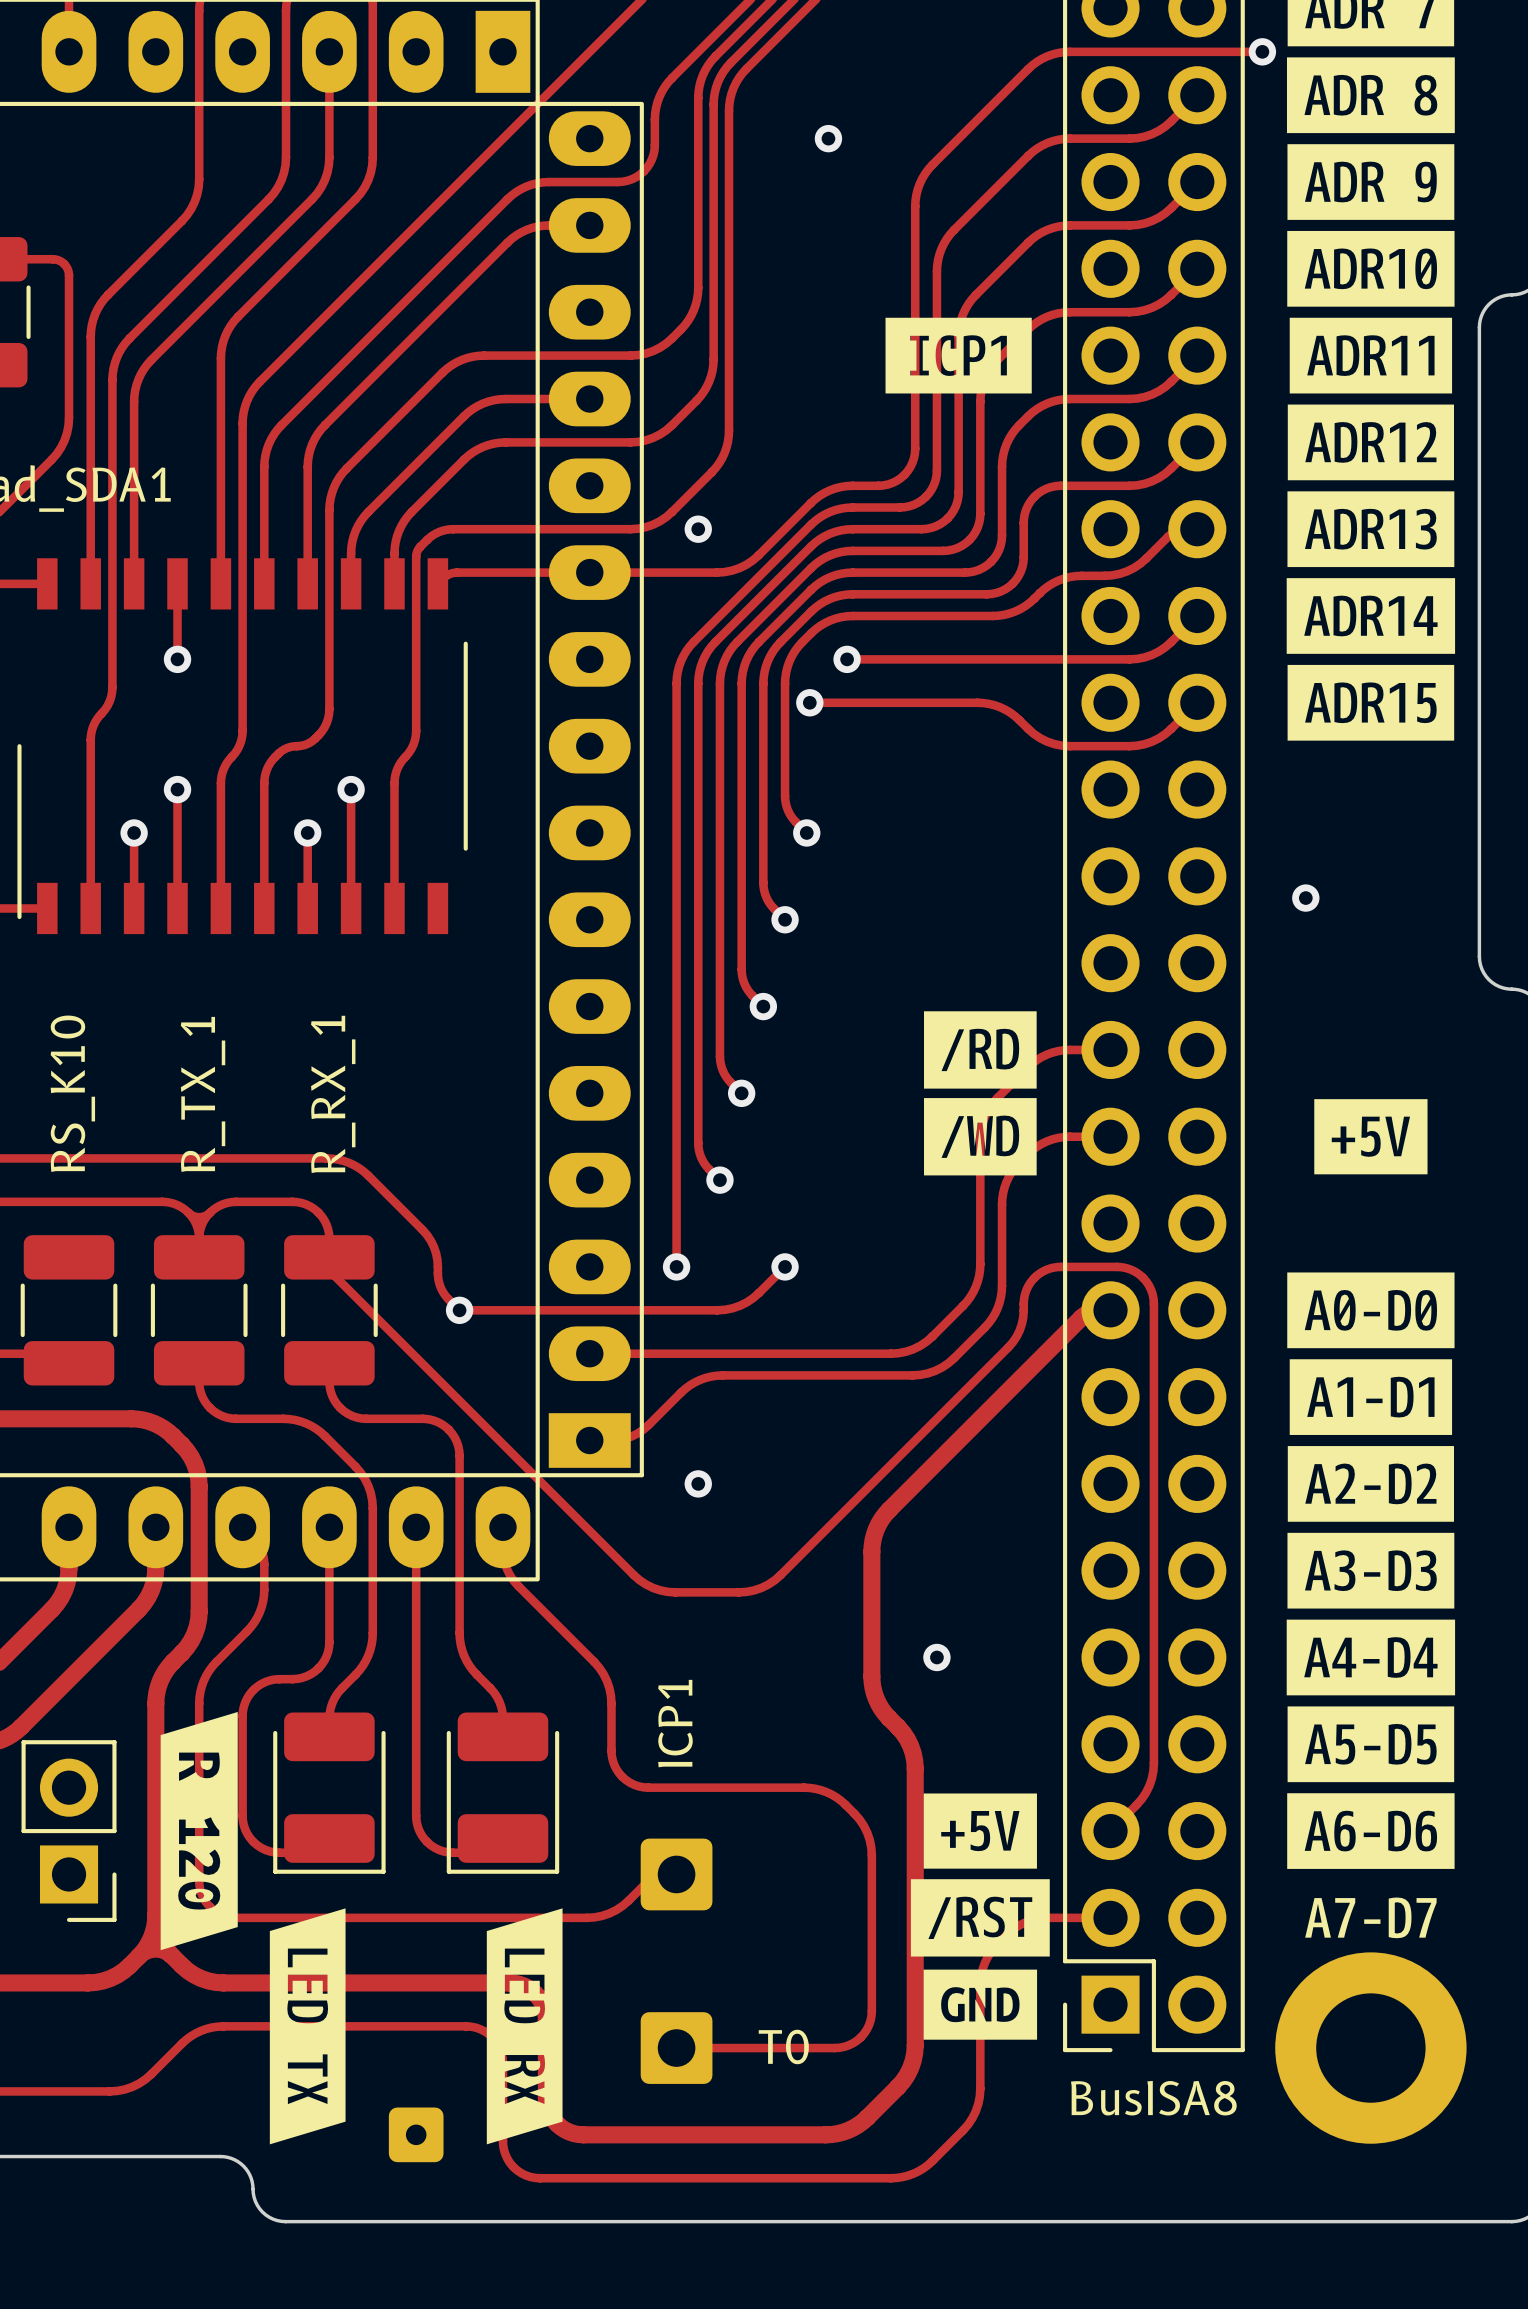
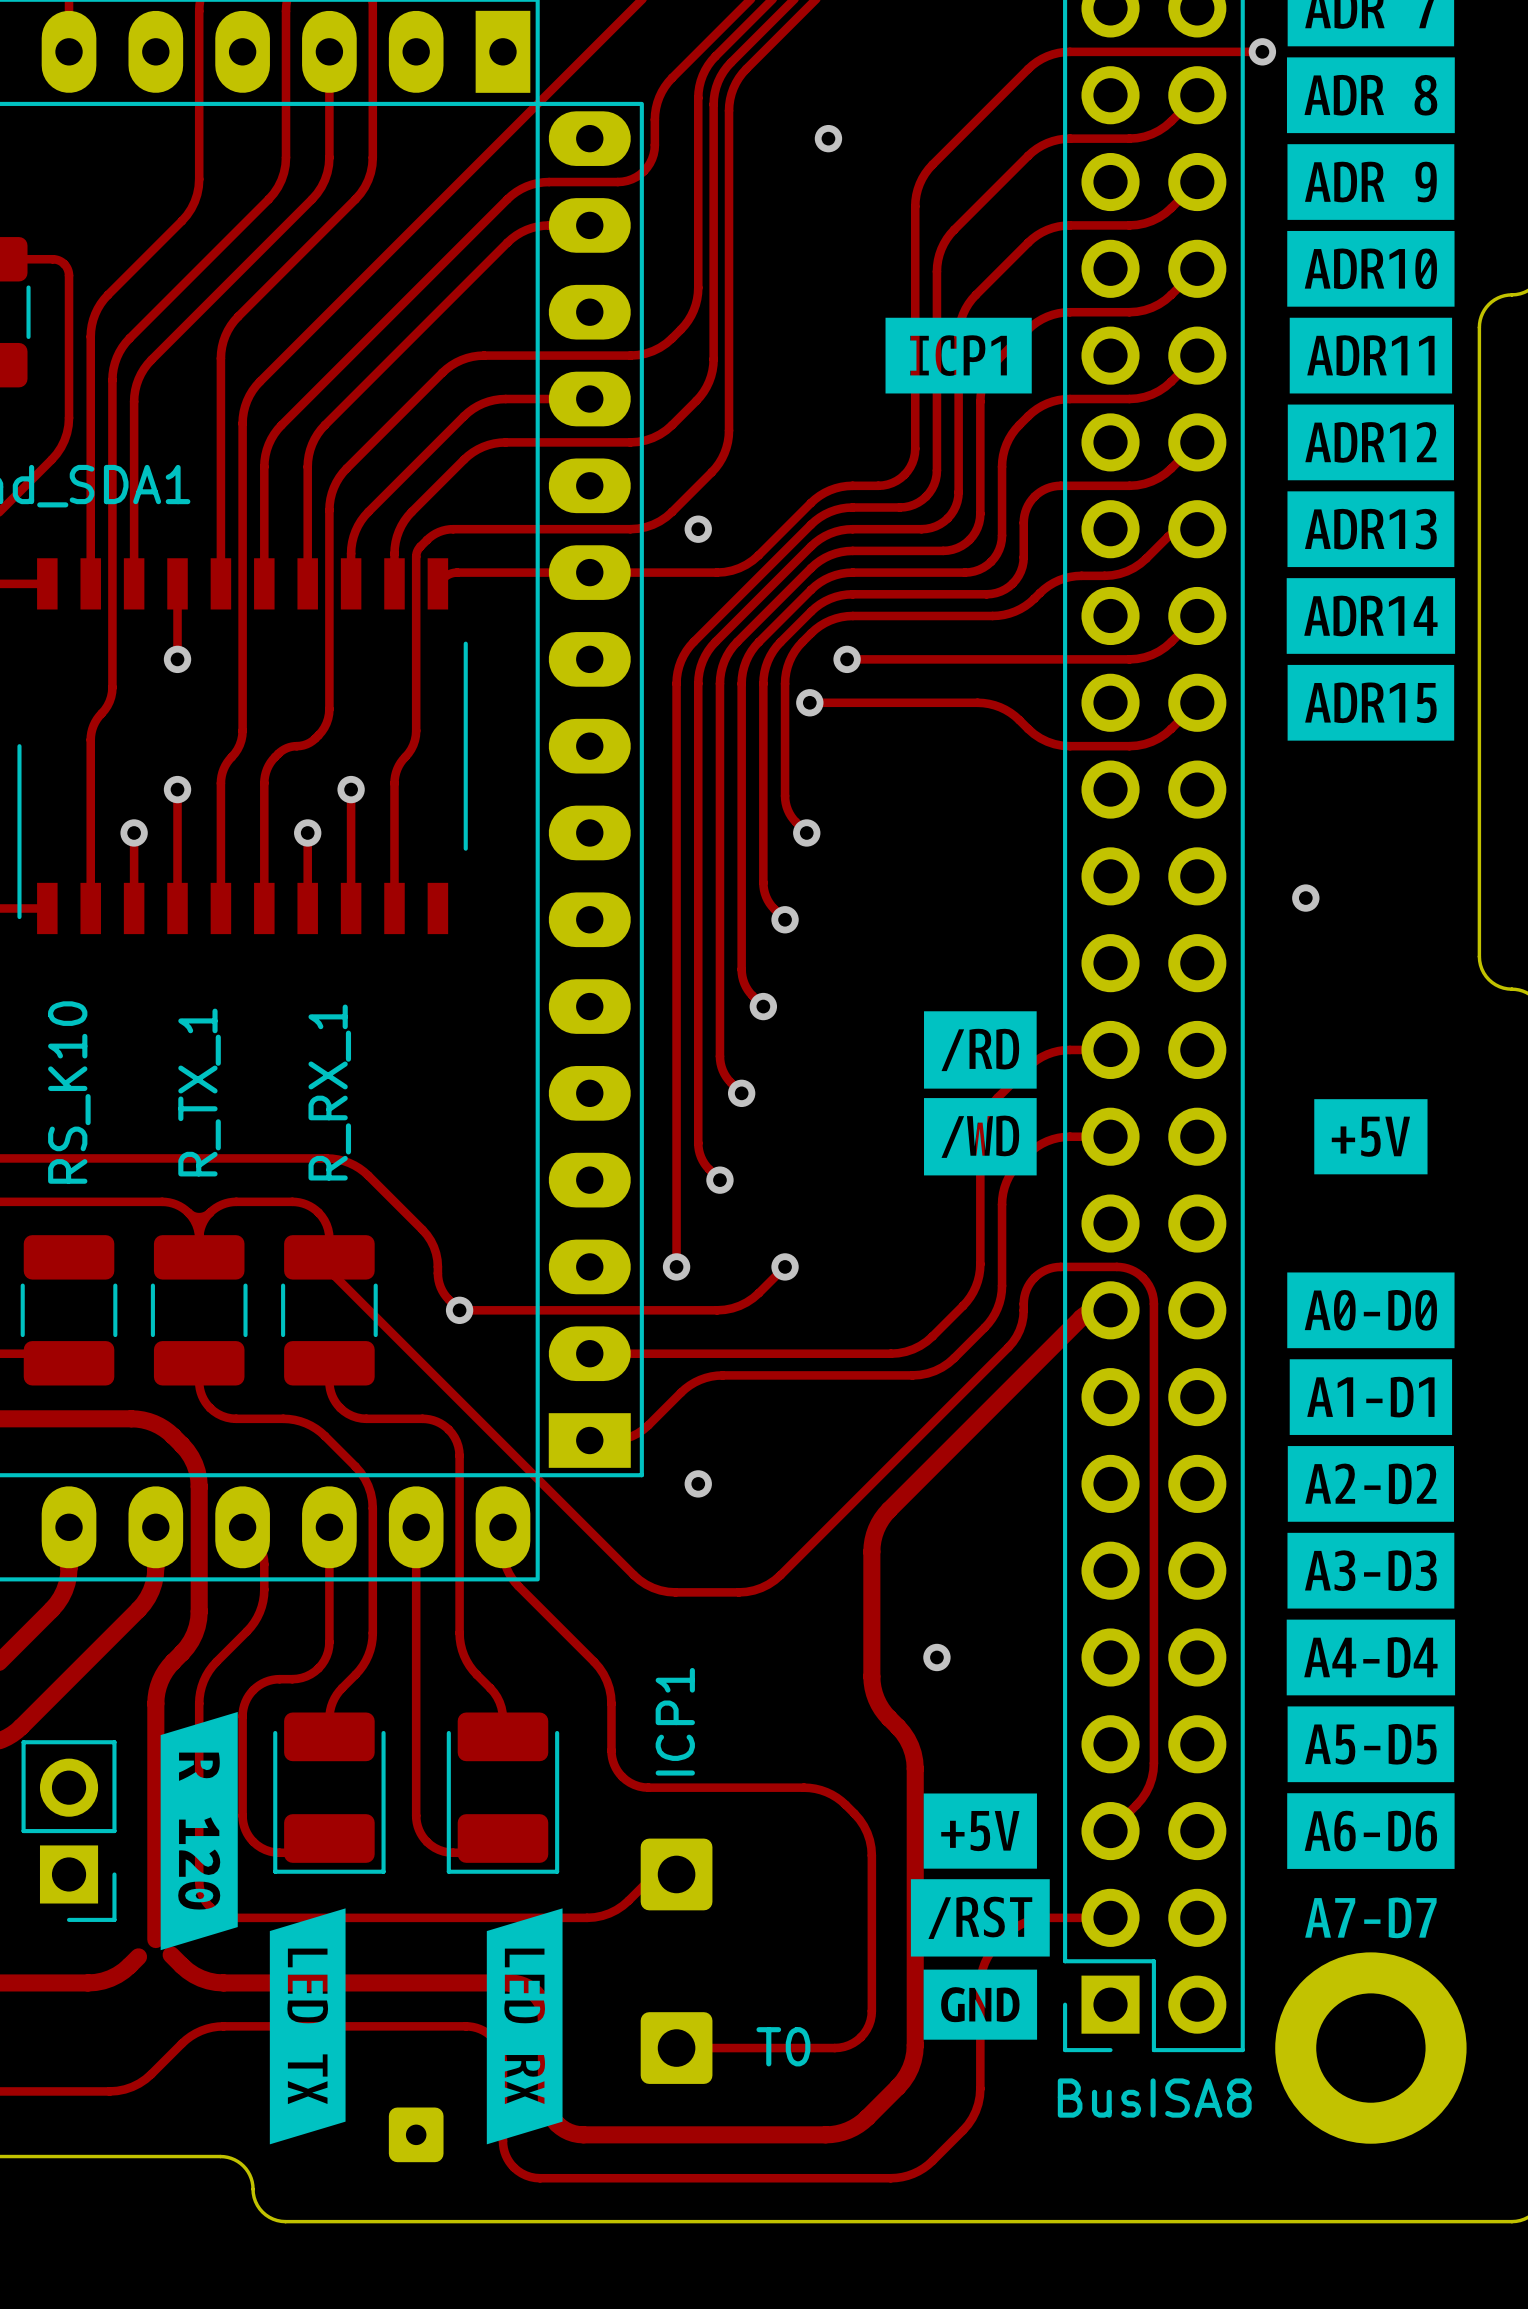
track: (155, 1915) (151, 1937) (138, 1956) (145, 1951) (154, 1949) (163, 1950) (171, 1954) (159, 1936) (155, 1915) -> (155, 1915) (155, 1939)

